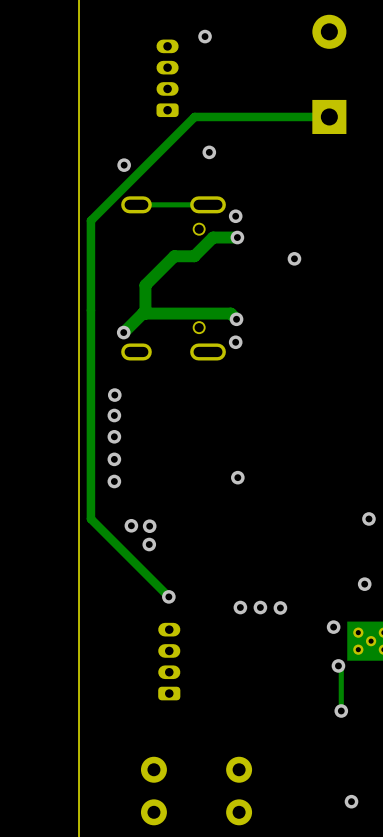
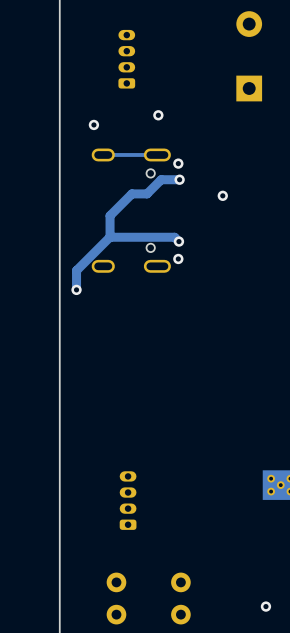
via: (205, 36) -> none
track: (329, 116) (194, 116) (90, 220) (90, 518) (168, 596) -> none
track: (145, 313) (143, 313) (123, 332) -> (110, 237) (76, 270) (76, 289)
via: (123, 332) -> none
via: none -> (76, 289)
via: (114, 395) -> none
via: (114, 415) -> none
via: (114, 436) -> none
via: (114, 459) -> none
via: (237, 477) -> none
via: (114, 481) -> none
via: (368, 518) -> none
via: (131, 525) -> none
via: (149, 526) -> none
via: (149, 544) -> none
via: (364, 584) -> none
via: (168, 596) -> none
via: (240, 607) -> none
via: (260, 607) -> none
via: (280, 607) -> none
via: (333, 627) -> none
track: (338, 665) (341, 668) (341, 710) -> none
via: (338, 665) -> none
via: (341, 710) -> none

